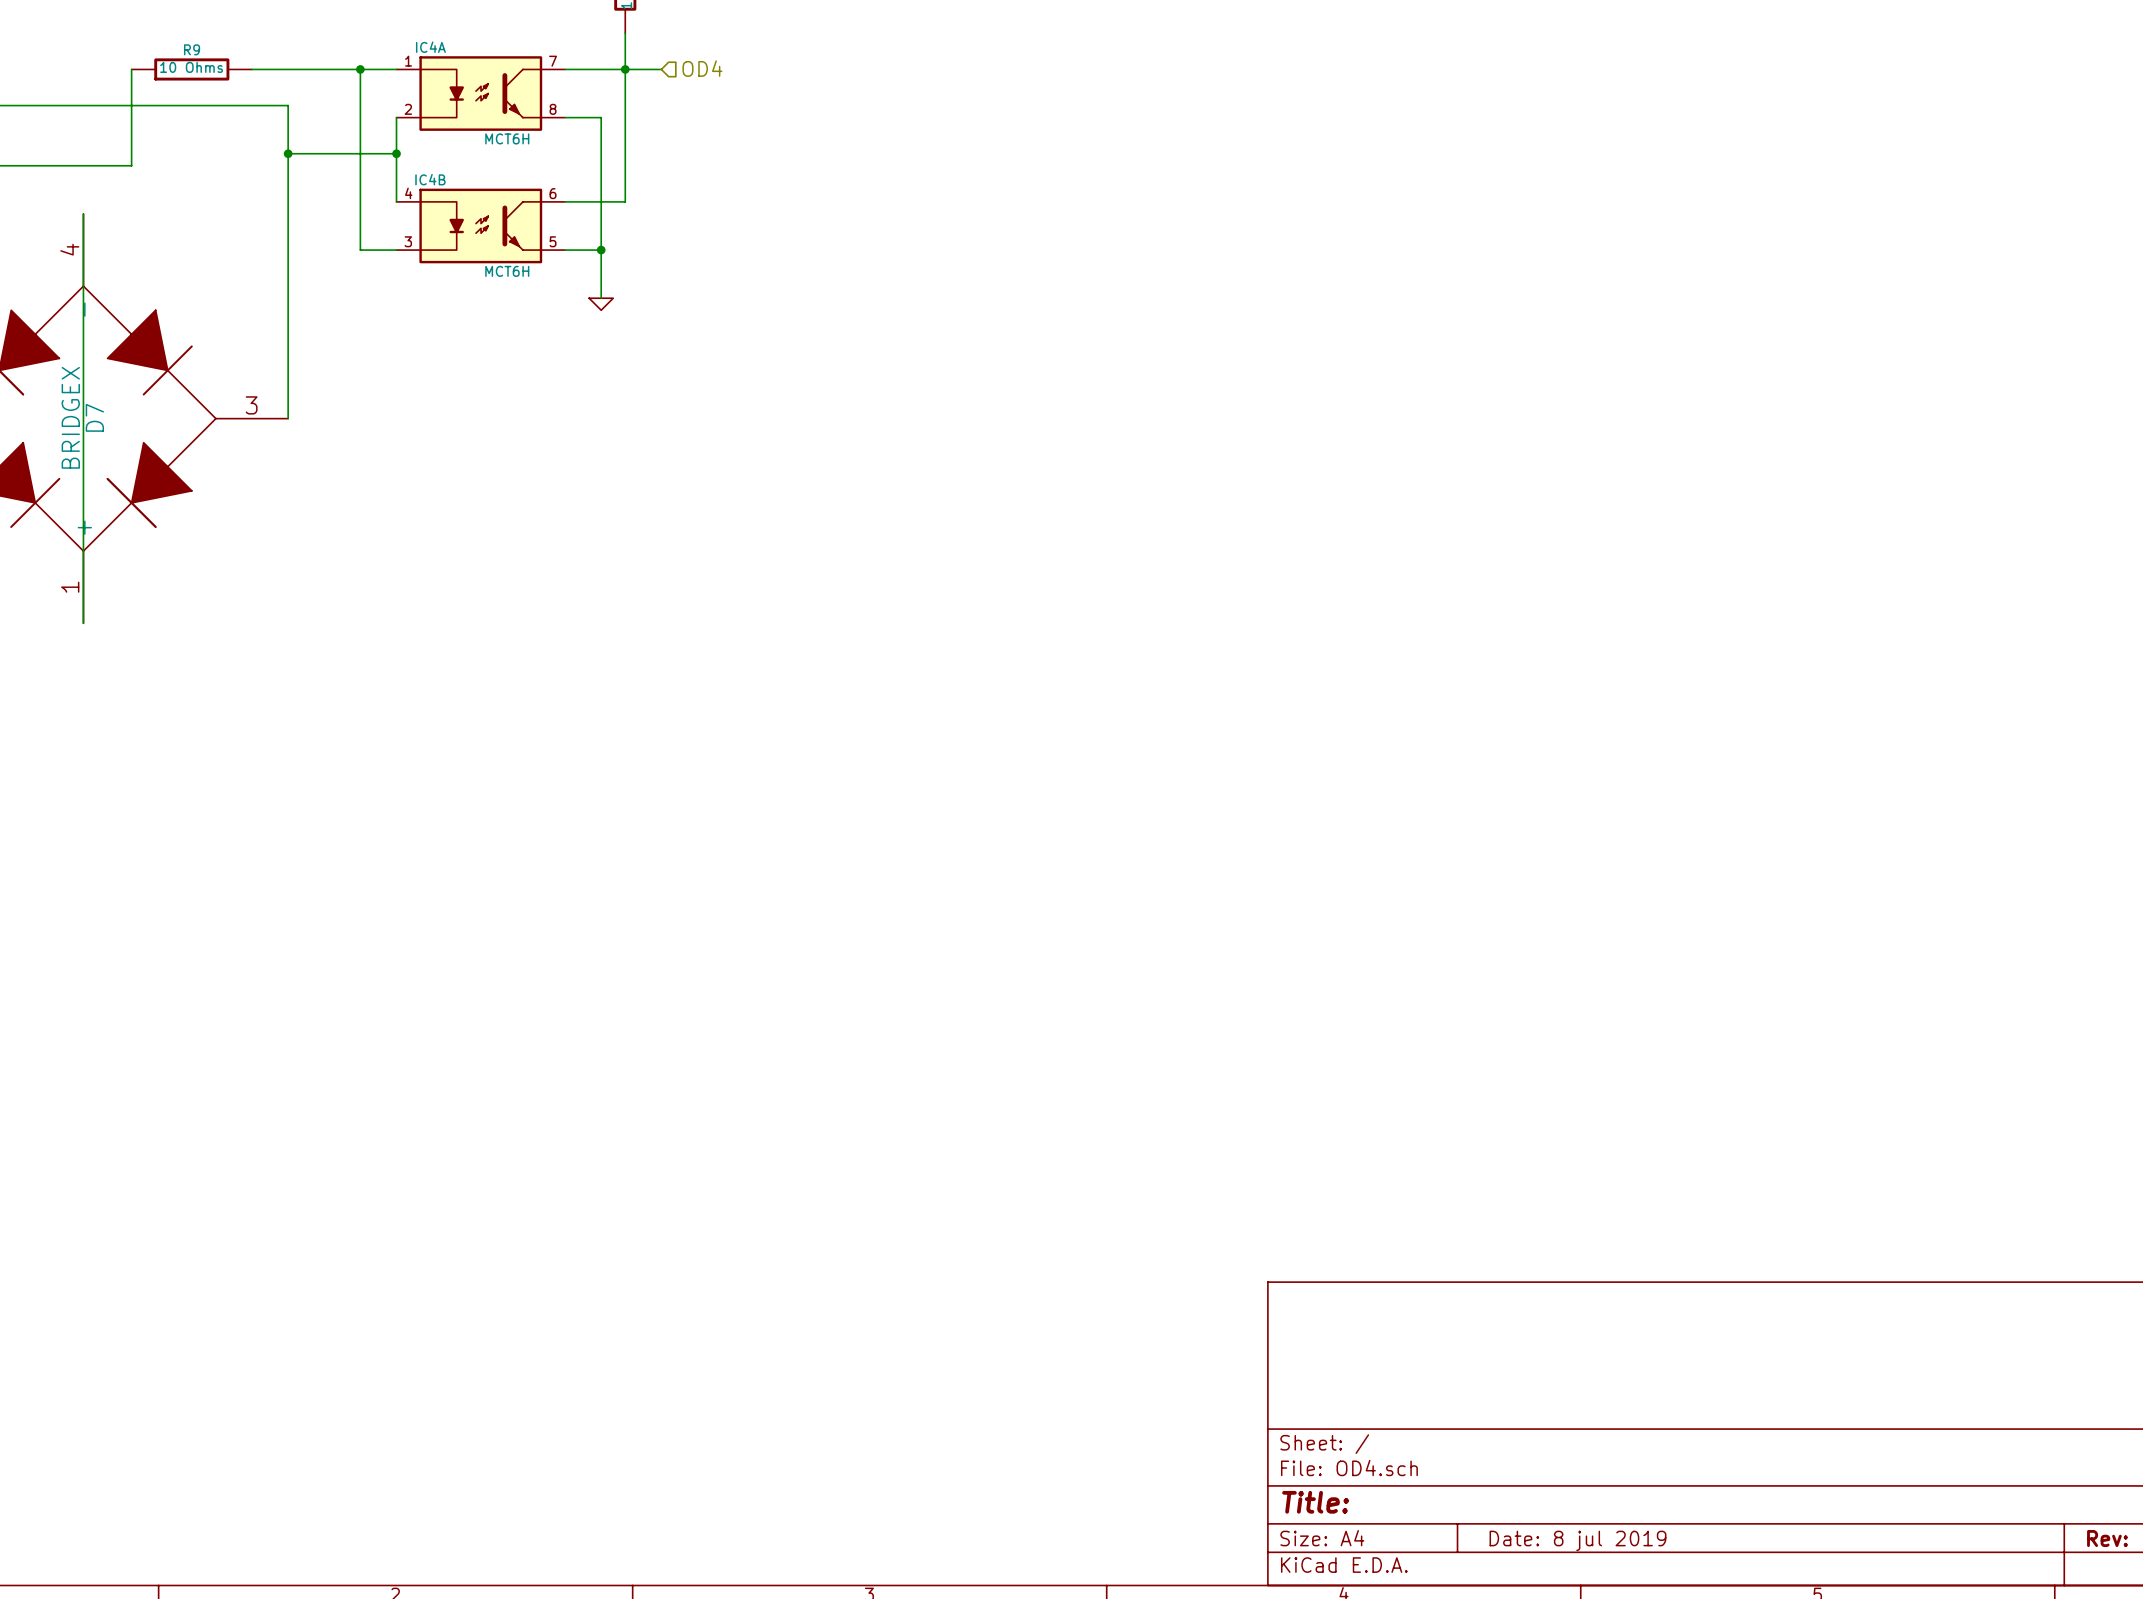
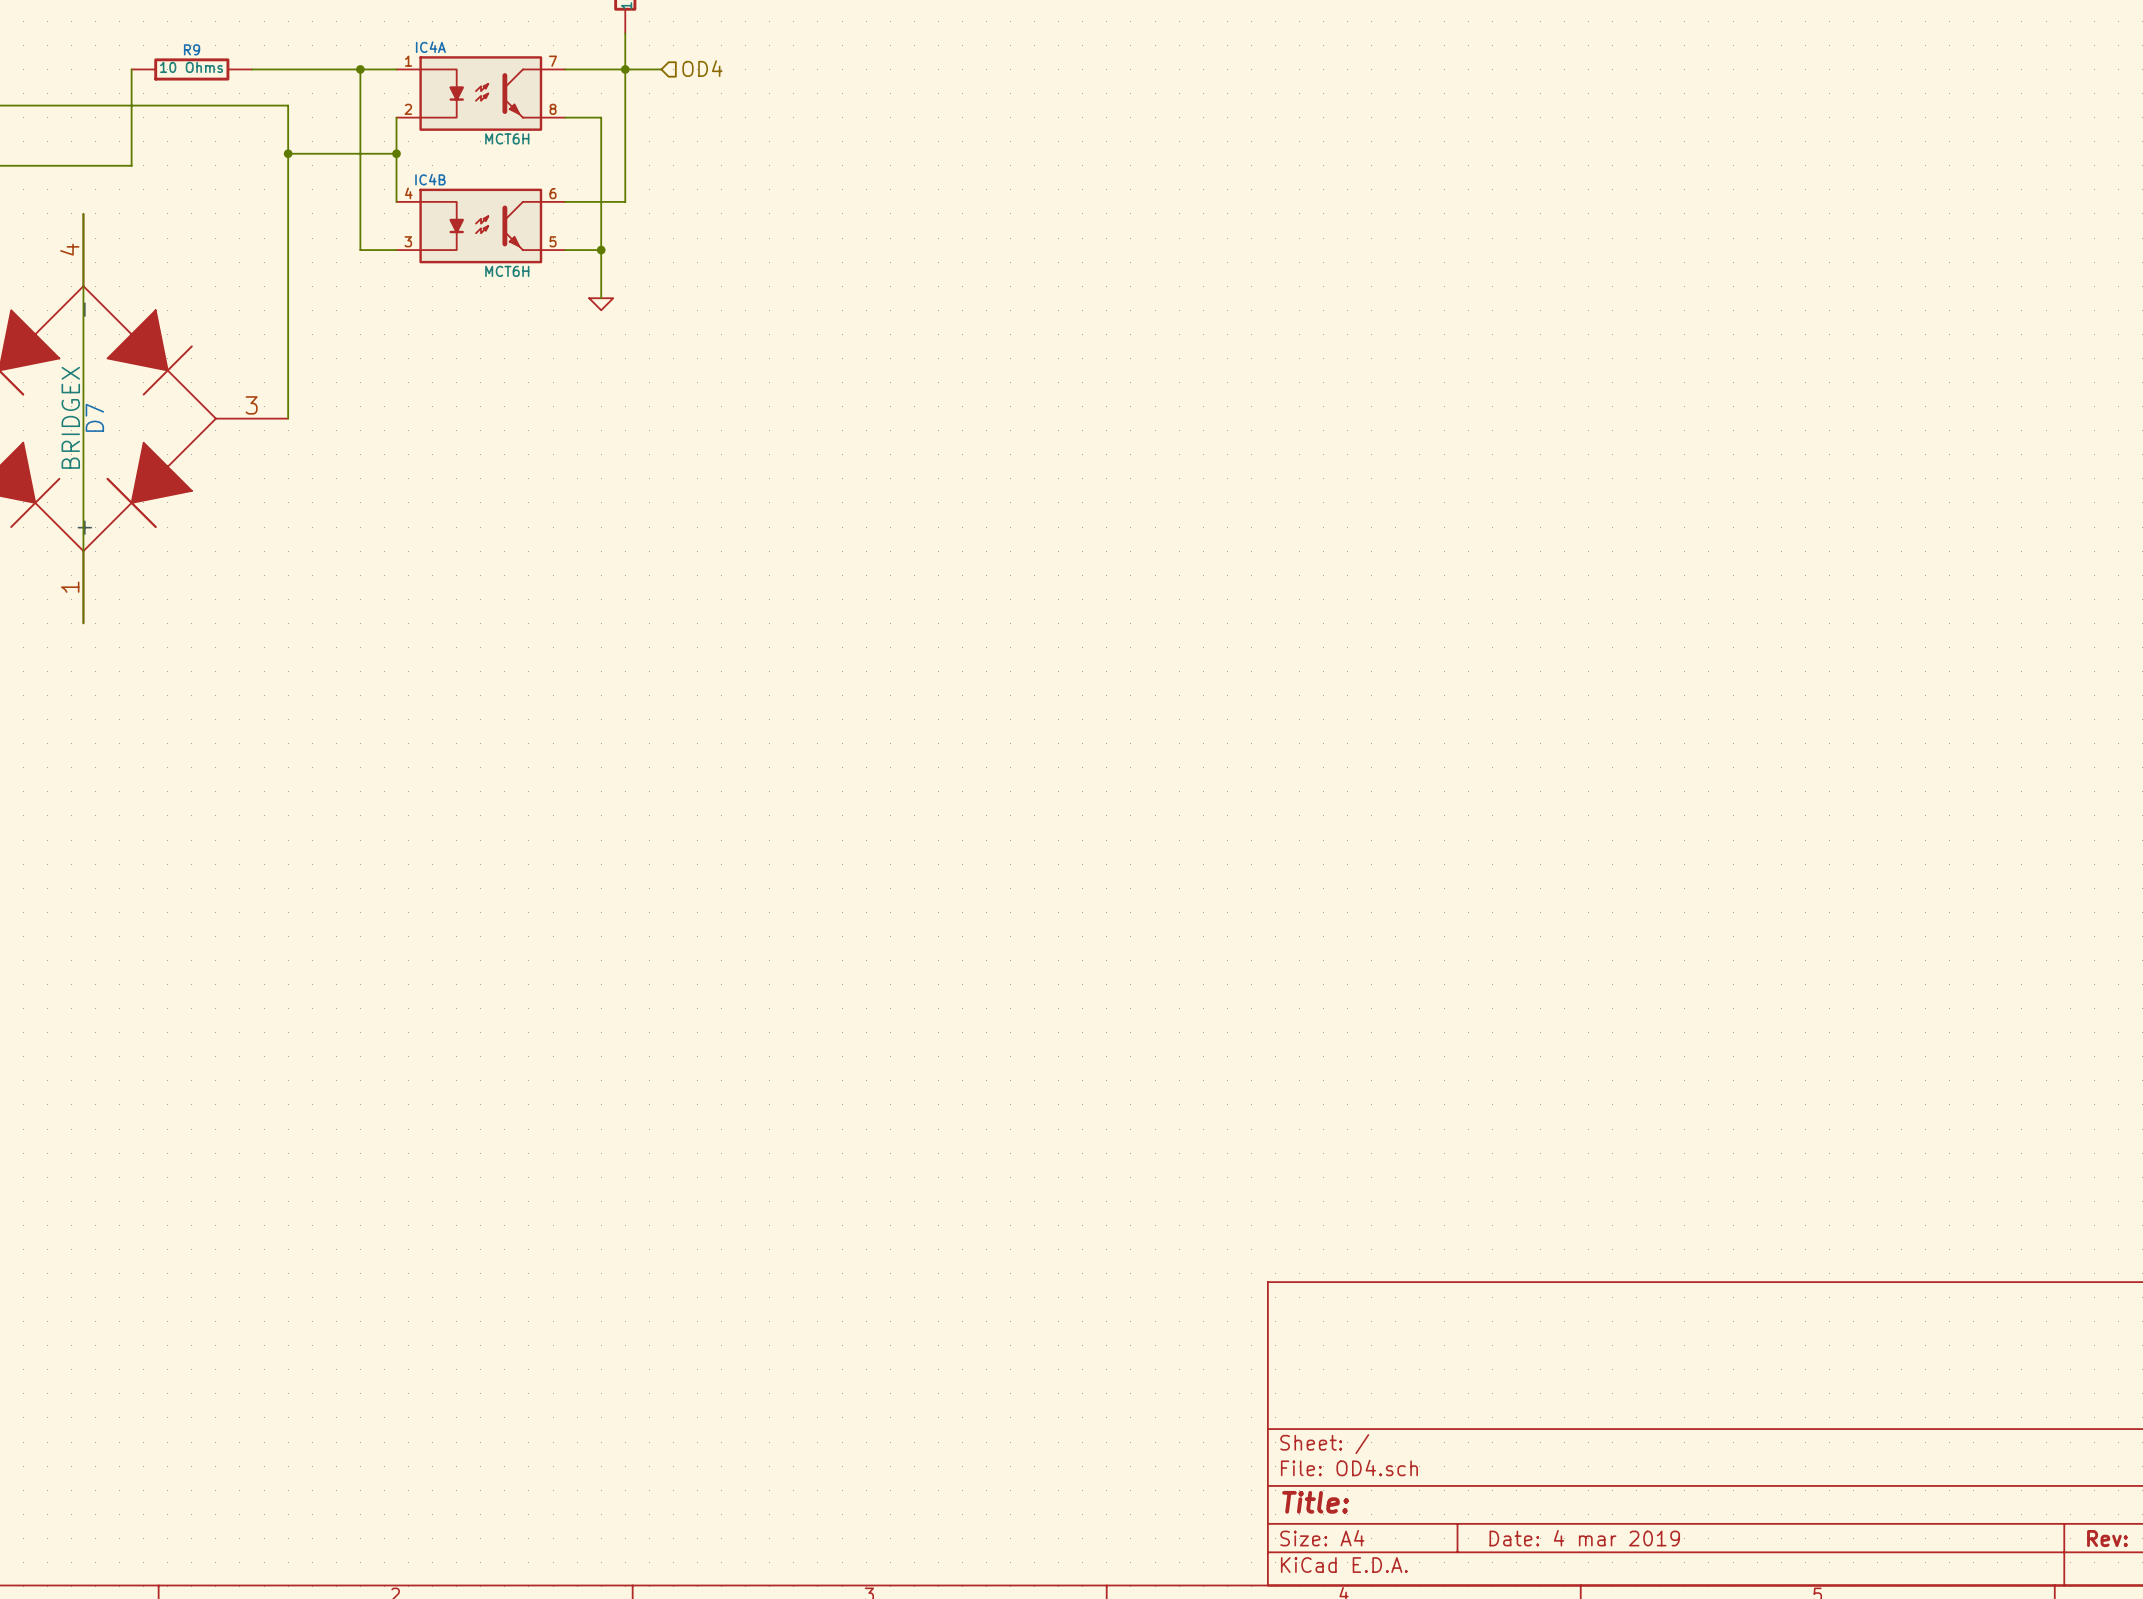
title block: Date: 8 jul 2019 (1577, 1540) -> Date: 4 mar 2019 (1584, 1538)

